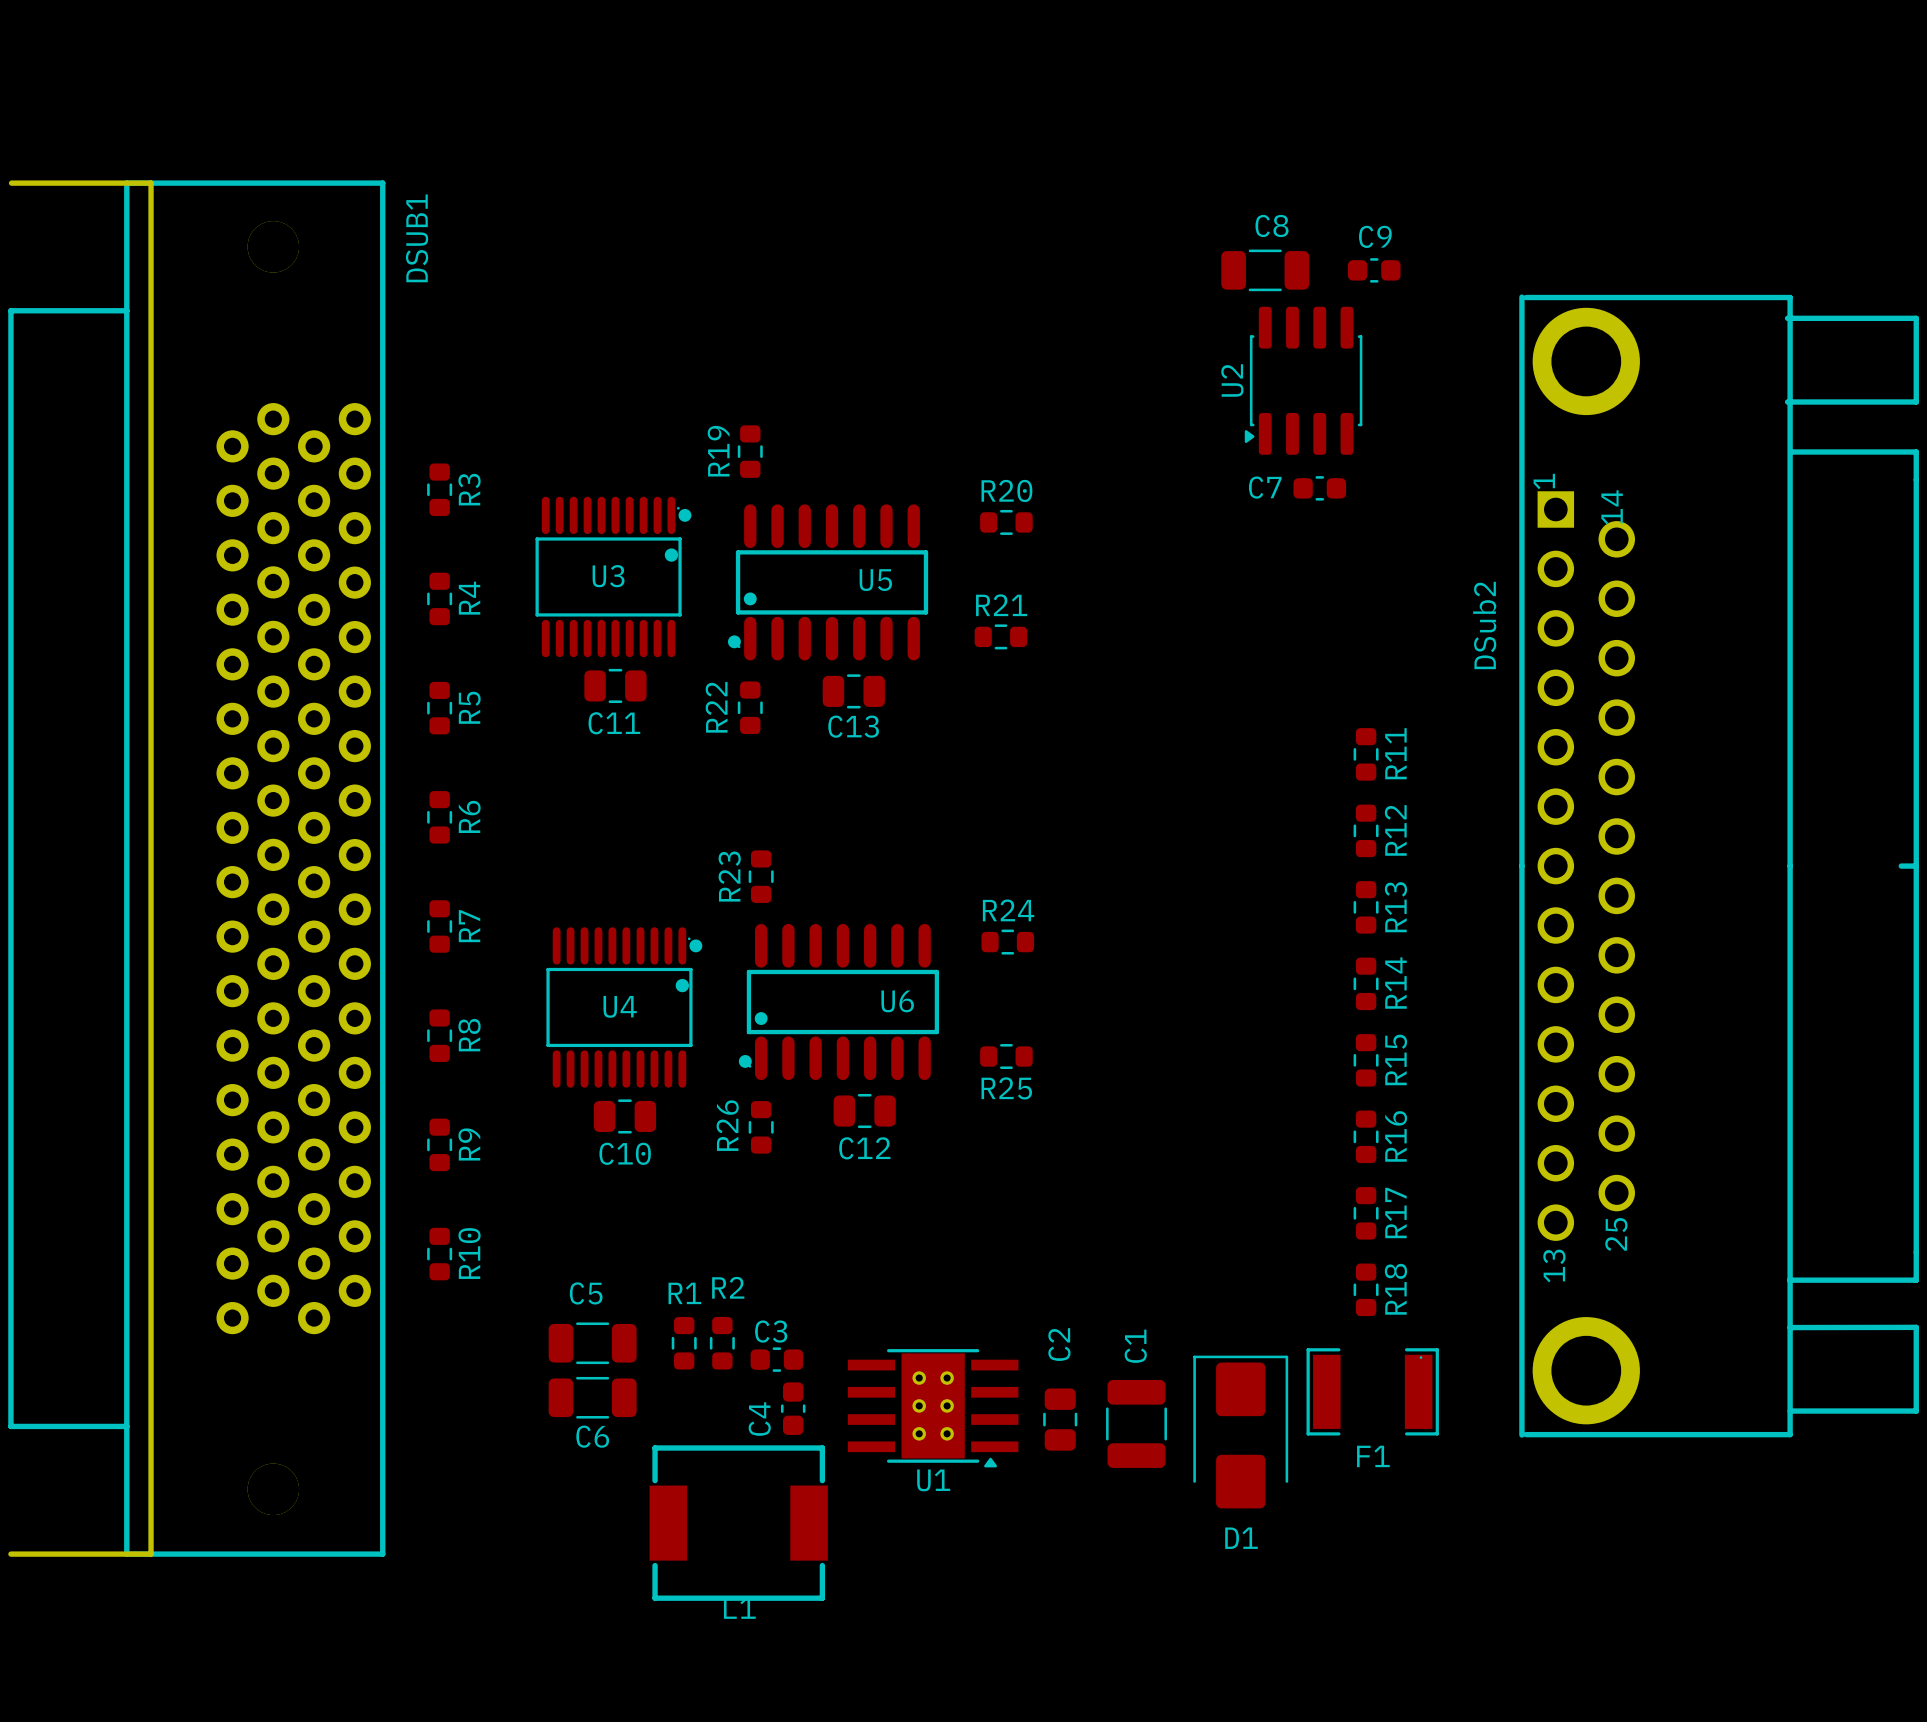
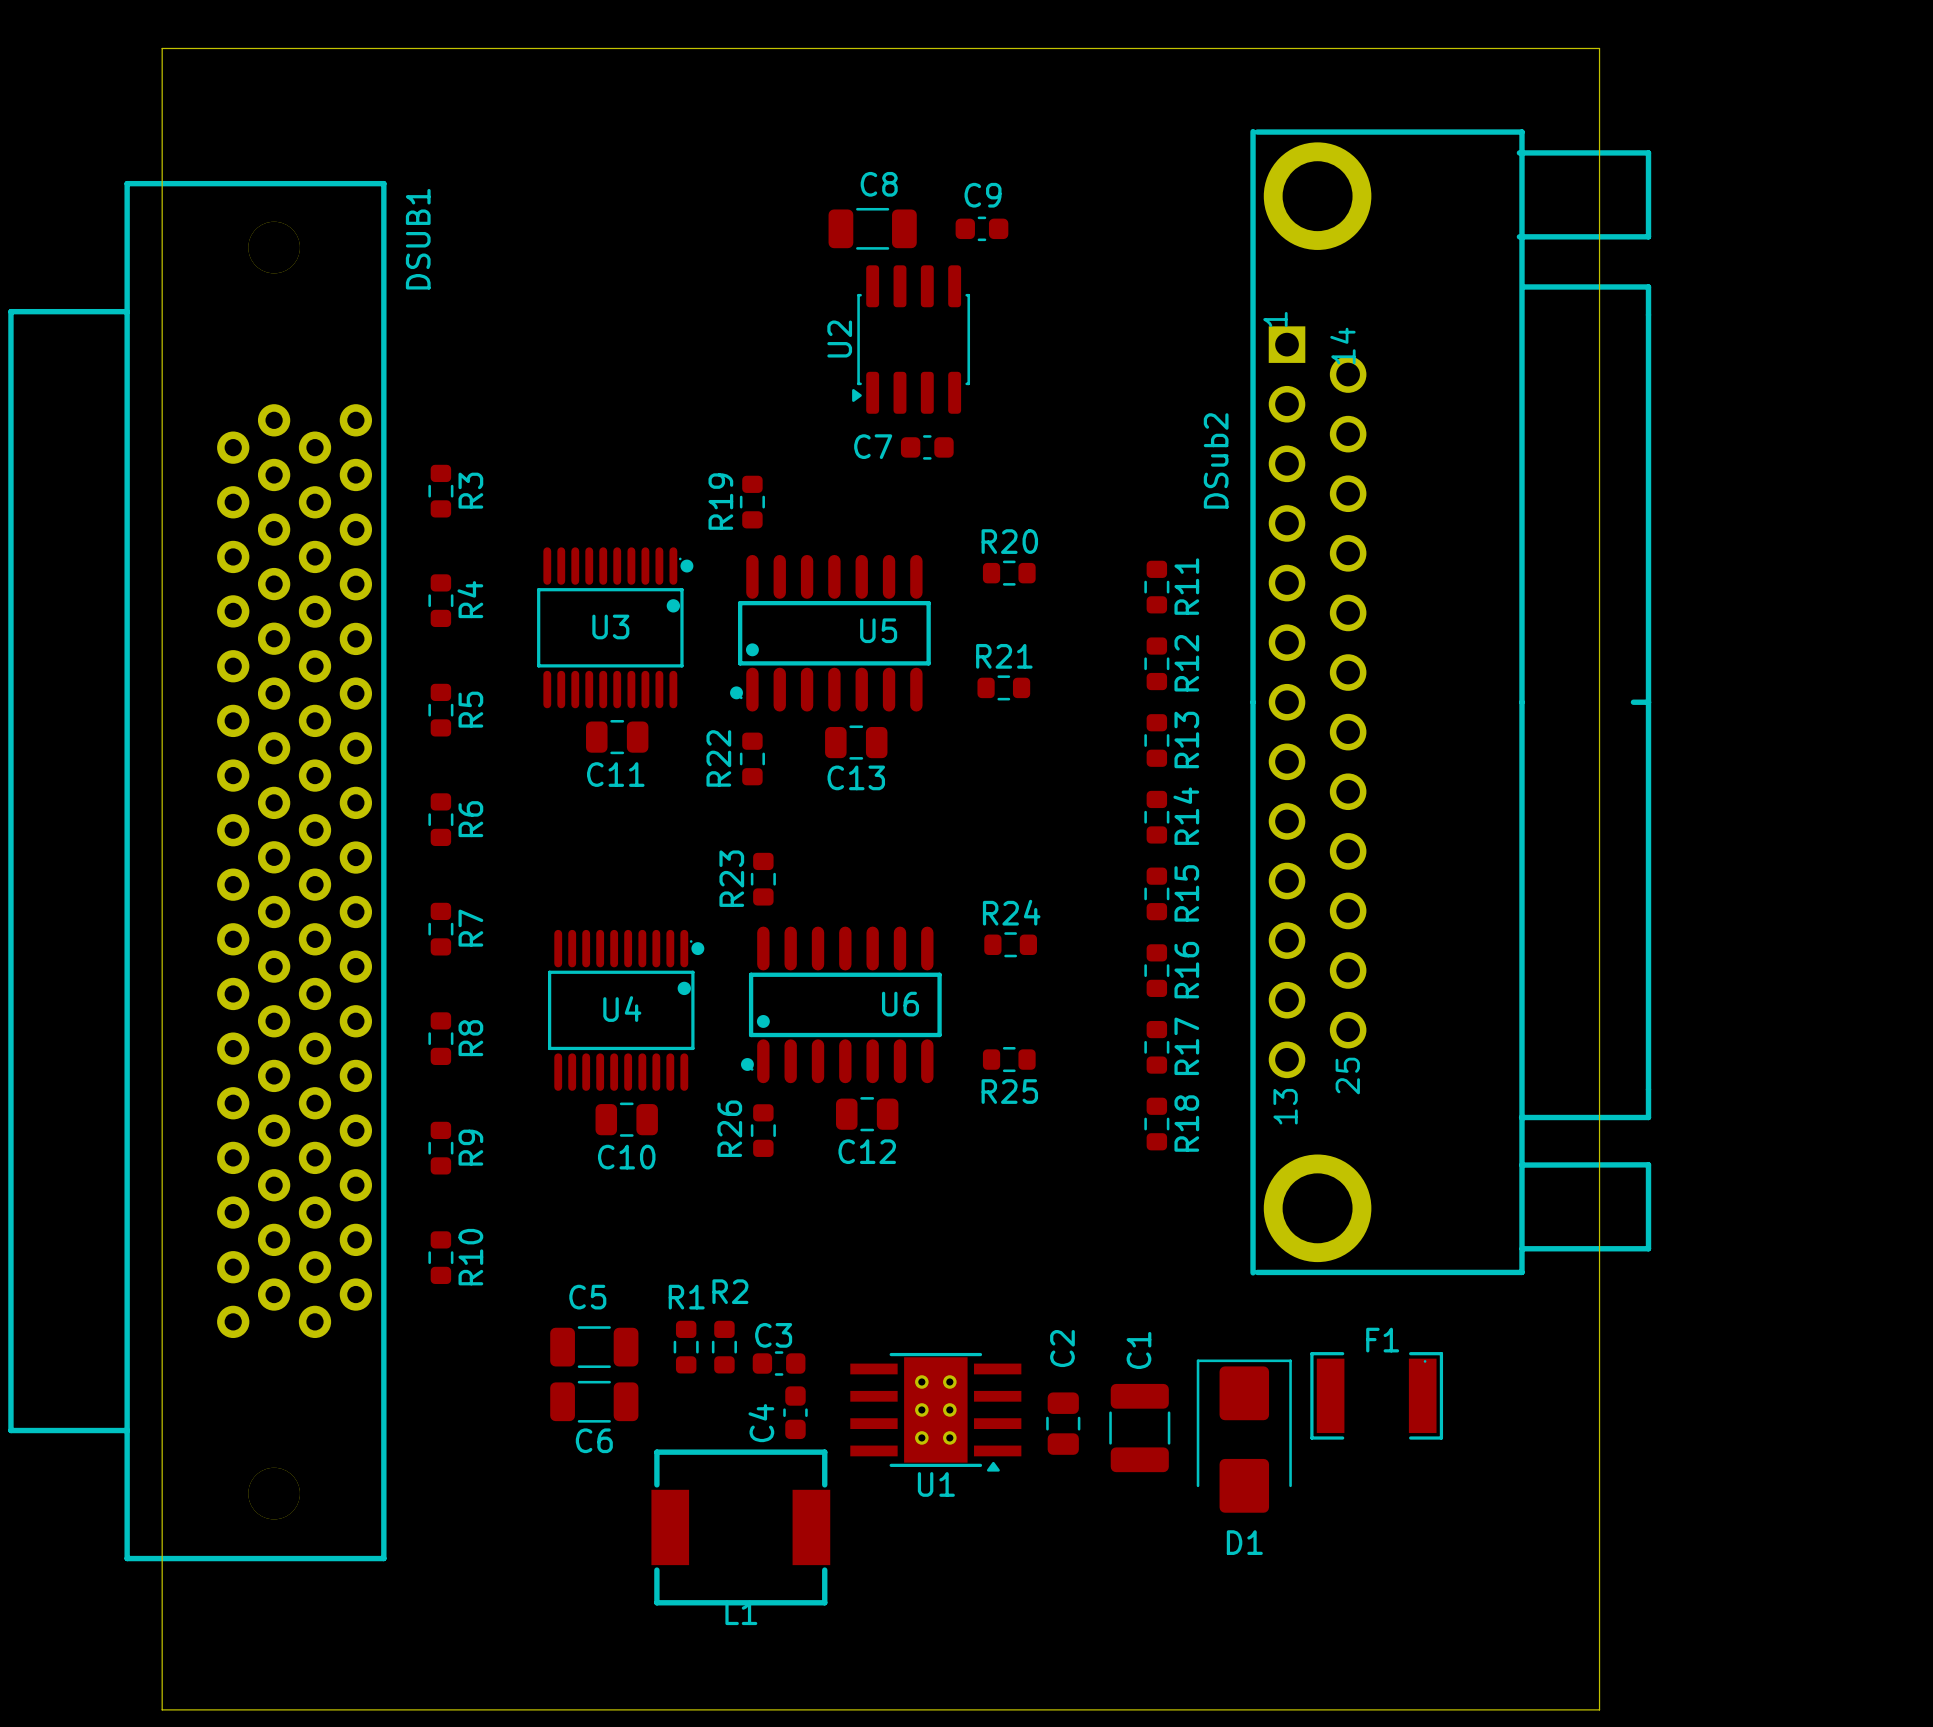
board edge: none -> (162, 48) (1599, 48) (1599, 1709) (162, 1709) (162, 48)
DSUB1 footprint: [8, 180, 386, 1557] -> [8, 180, 387, 1562]
C8 position: (1265, 270) -> (872, 228)
C9 position: (1374, 270) -> (981, 228)
U2 position: (1303, 380) -> (911, 339)
R19 position: (750, 451) -> (752, 502)
C7 position: (1319, 488) -> (927, 447)
R20 position: (1006, 522) -> (1009, 573)
U3 position: (613, 576) -> (615, 627)
U5 position: (828, 582) -> (830, 633)
R21 position: (1000, 636) -> (1003, 687)
C11 position: (615, 685) -> (617, 737)
C13 position: (853, 691) -> (856, 742)
R22 position: (750, 707) -> (752, 758)
R11 position: (1366, 754) -> (1156, 587)
R12 position: (1366, 830) -> (1156, 663)
DSub2 position: (1719, 866) -> (1450, 702)
R13 position: (1366, 907) -> (1156, 740)
R14 position: (1366, 983) -> (1156, 817)
R15 position: (1366, 1060) -> (1156, 893)
R16 position: (1366, 1136) -> (1156, 970)
R17 position: (1366, 1213) -> (1156, 1047)
R18 position: (1366, 1289) -> (1156, 1124)
F1 name position: F1 (1373, 1456) -> F1 (1382, 1340)

